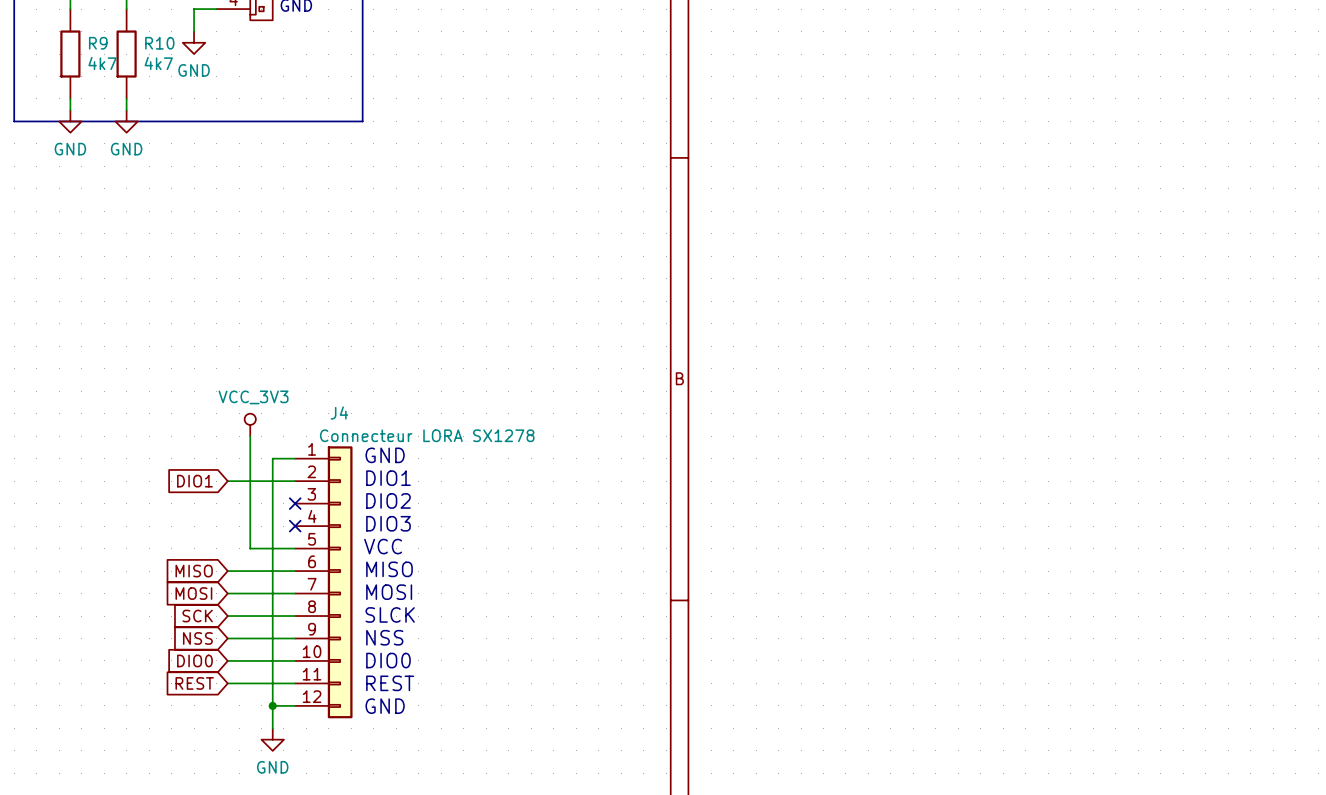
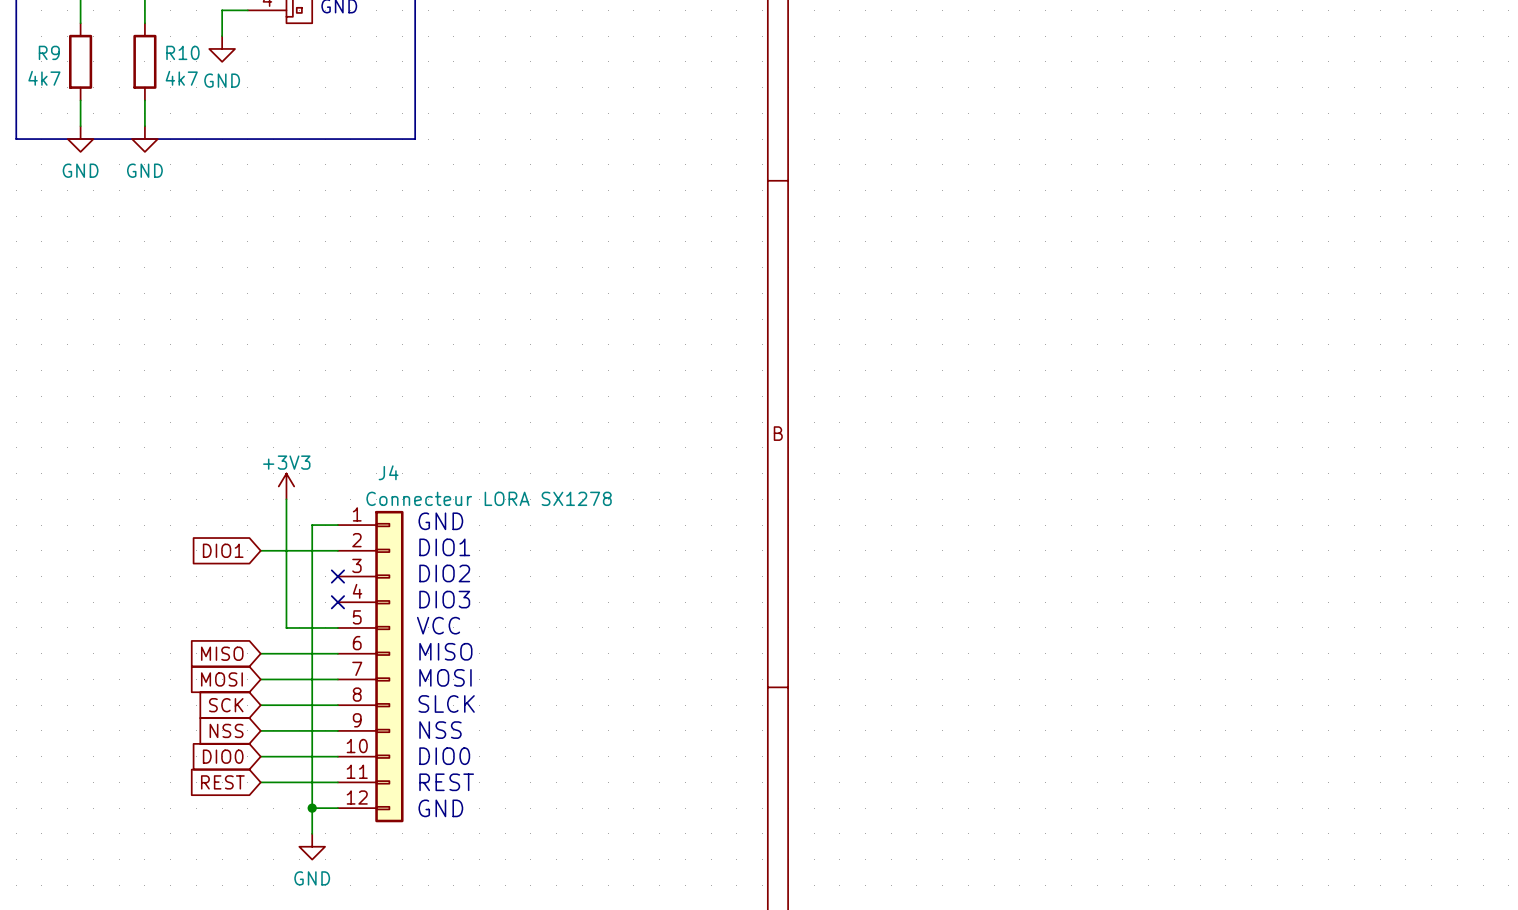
R9 symbol: [60, 9, 81, 99] -> [69, 23, 93, 101]
R10 symbol: [116, 9, 137, 99] -> [133, 23, 157, 101]
R9 name position: R9 (98, 43) -> R9 (49, 52)
R9 value position: 4k7 (102, 63) -> 4k7 (44, 78)
power symbol: VCC_3V3 (250, 424) -> +3V3 (286, 486)

